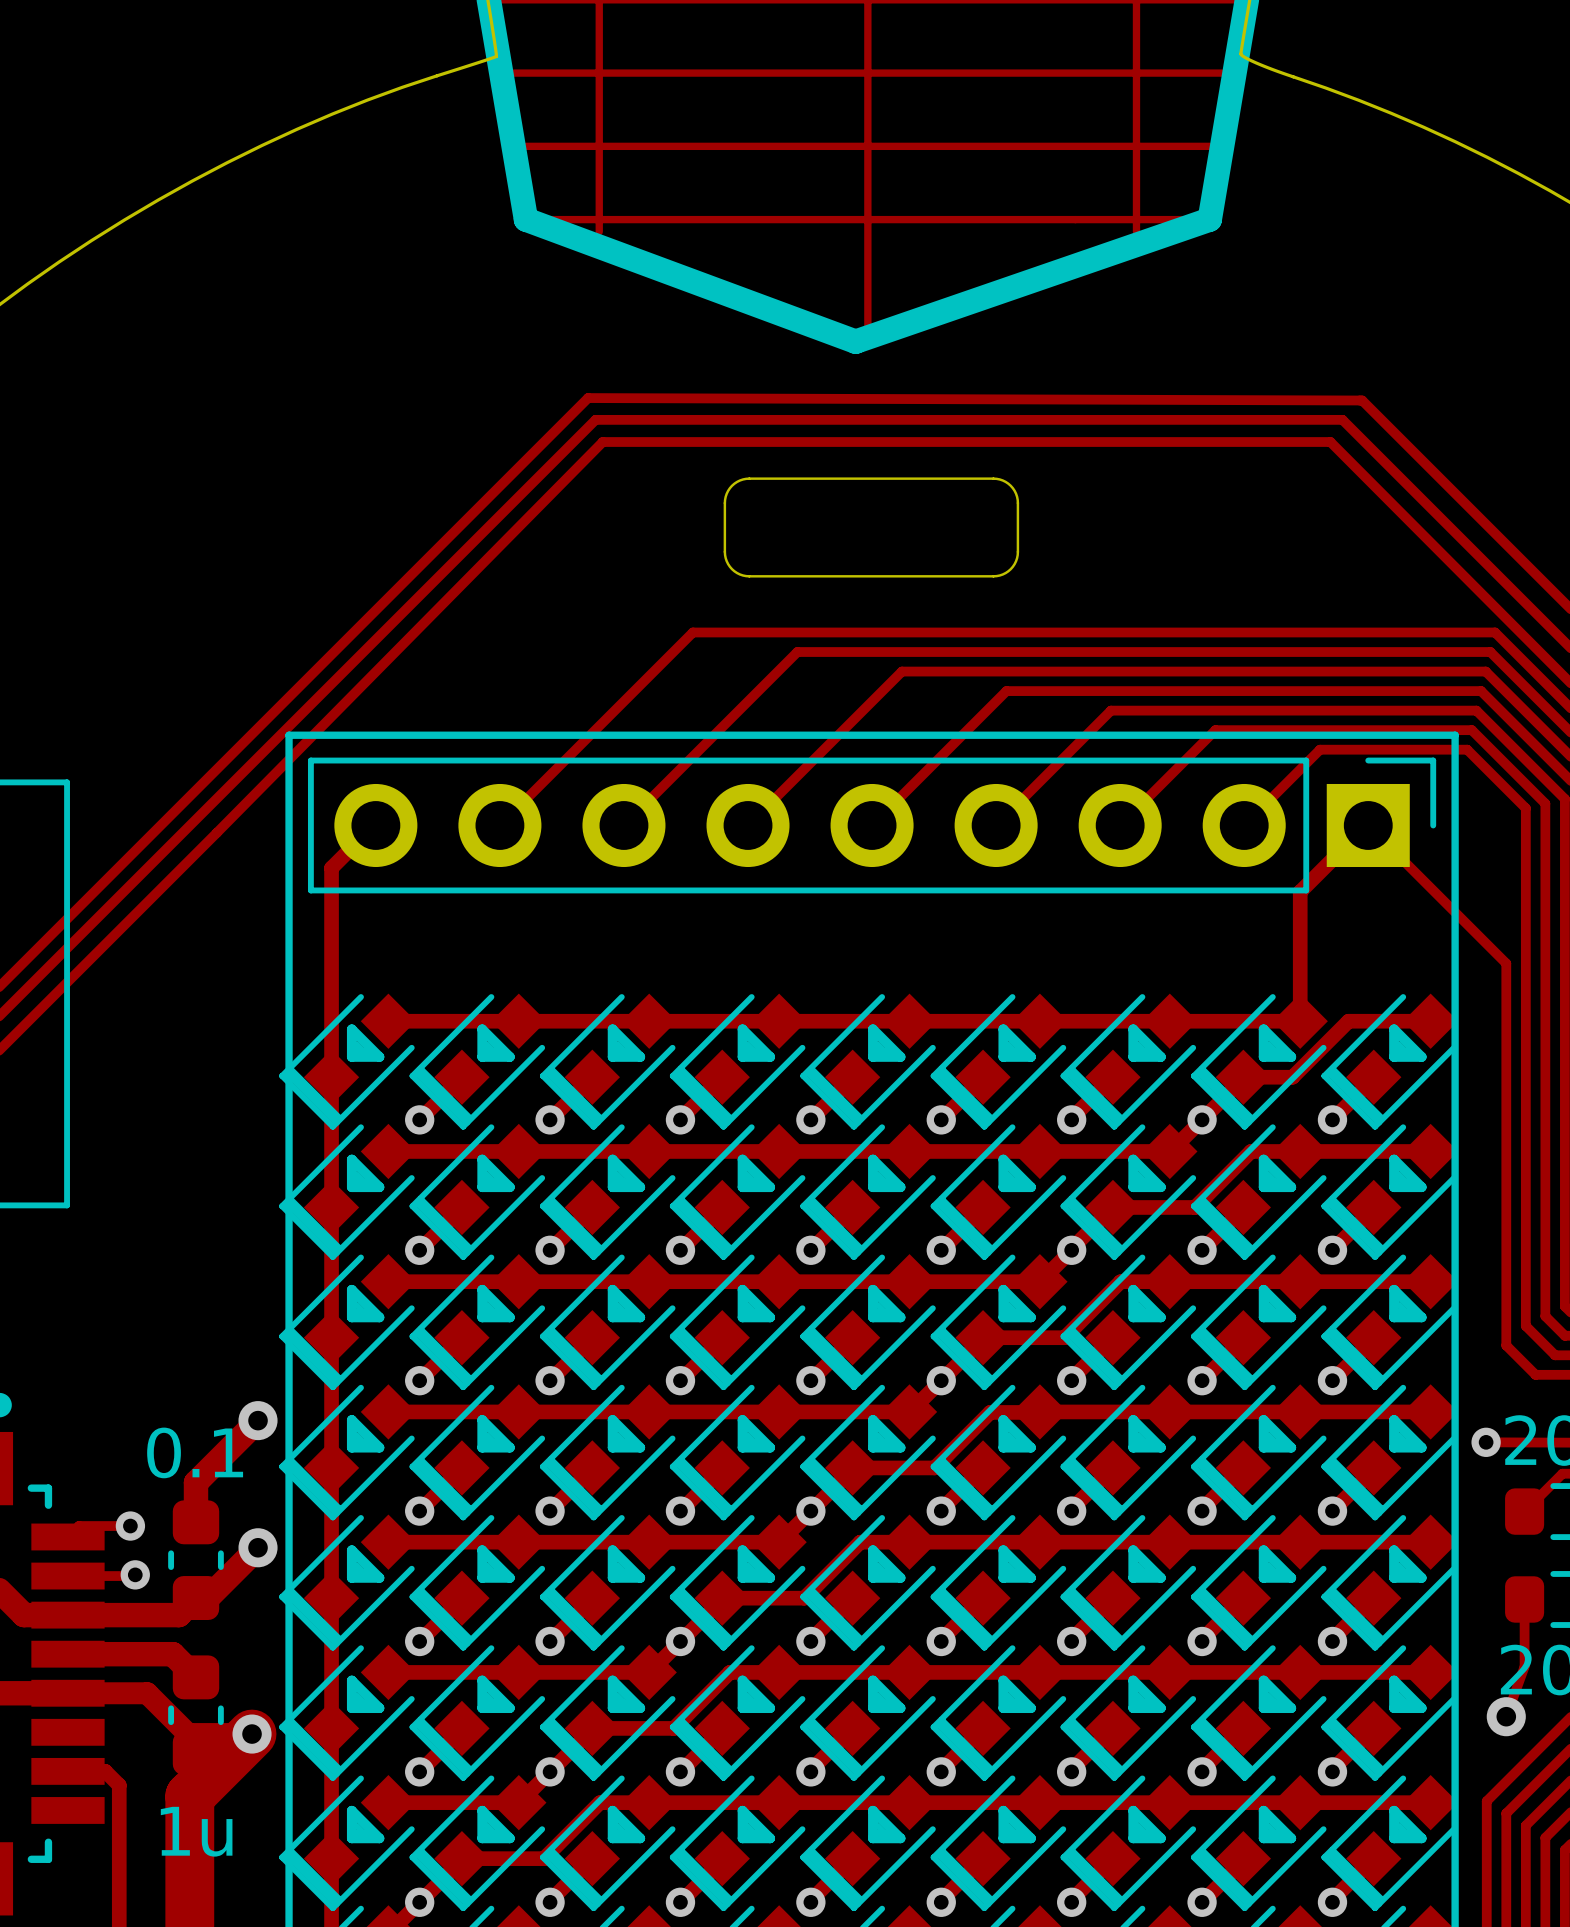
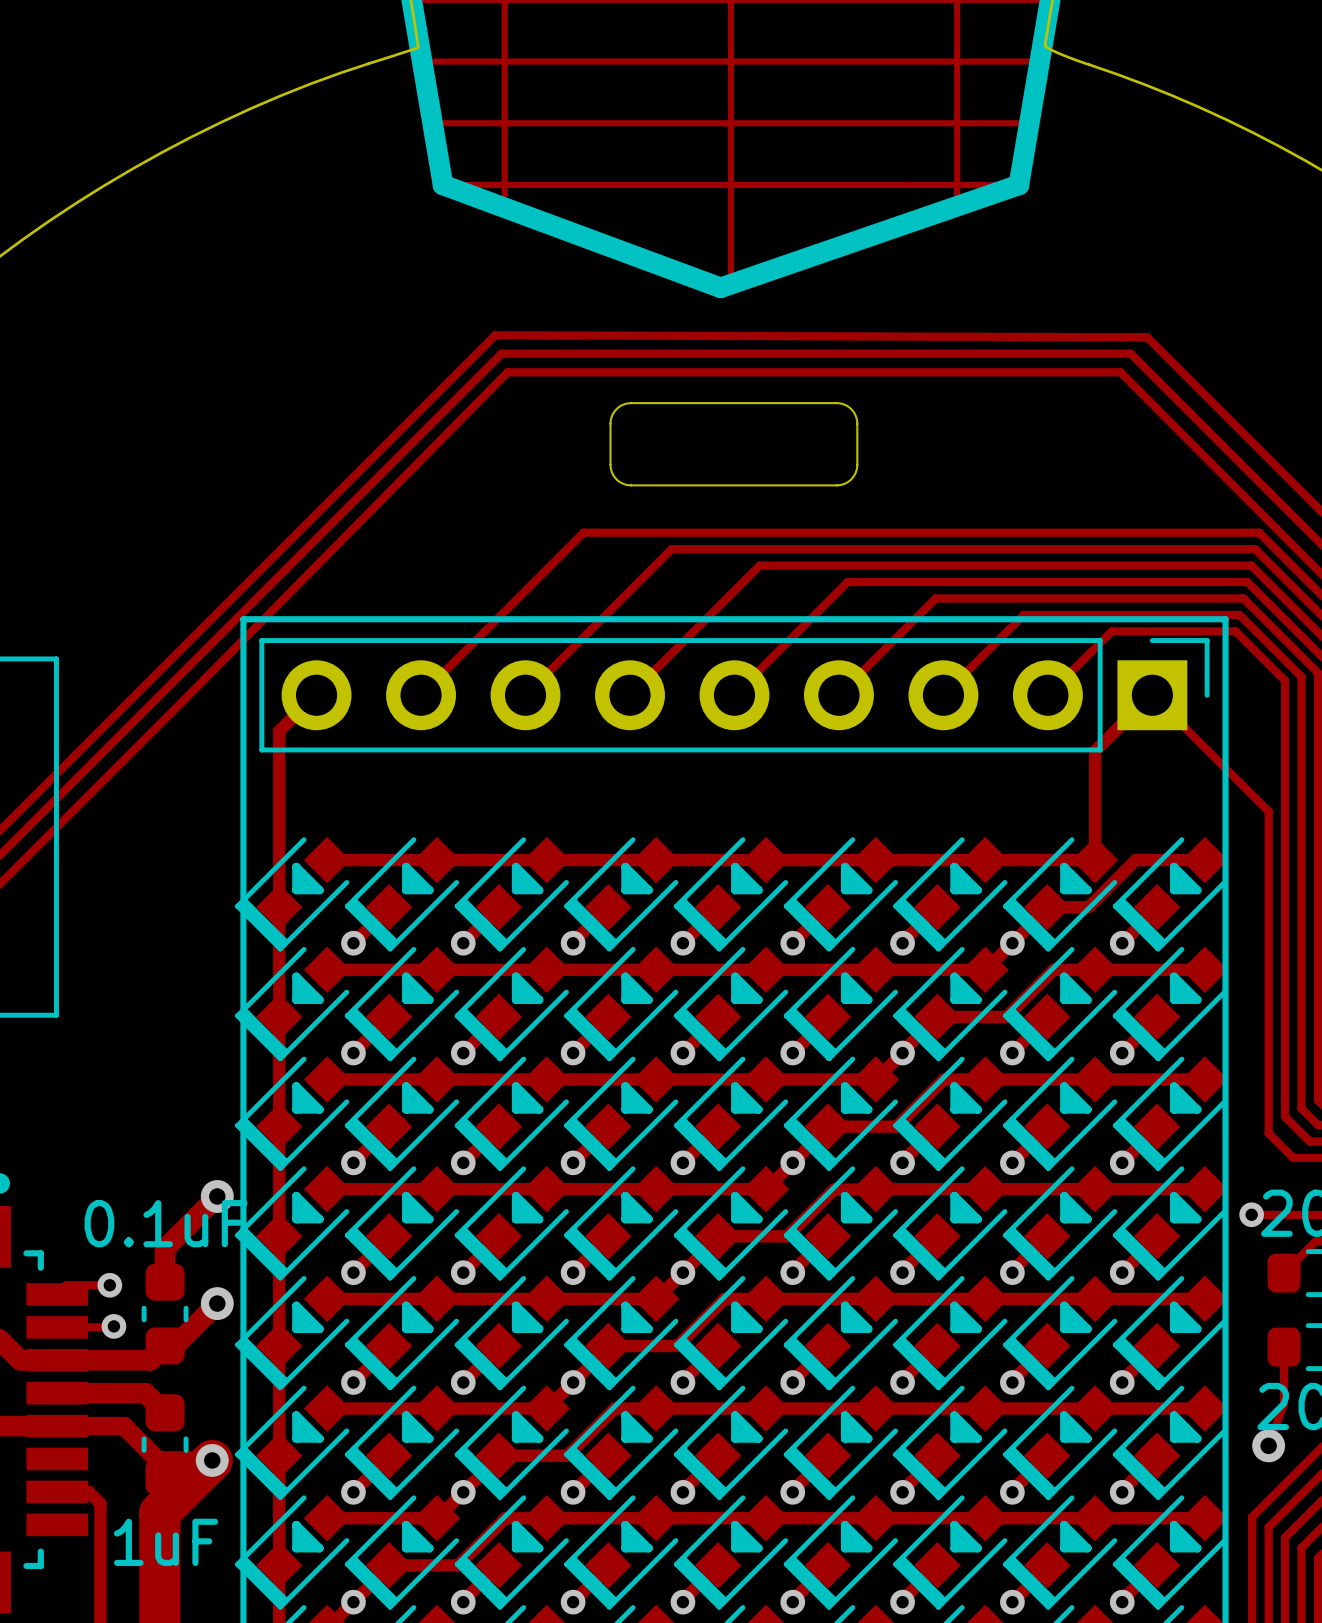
part value: 0.1 (195, 1452) -> 0.1uF (166, 1223)
part value: 1u (196, 1831) -> 1uF (166, 1542)

